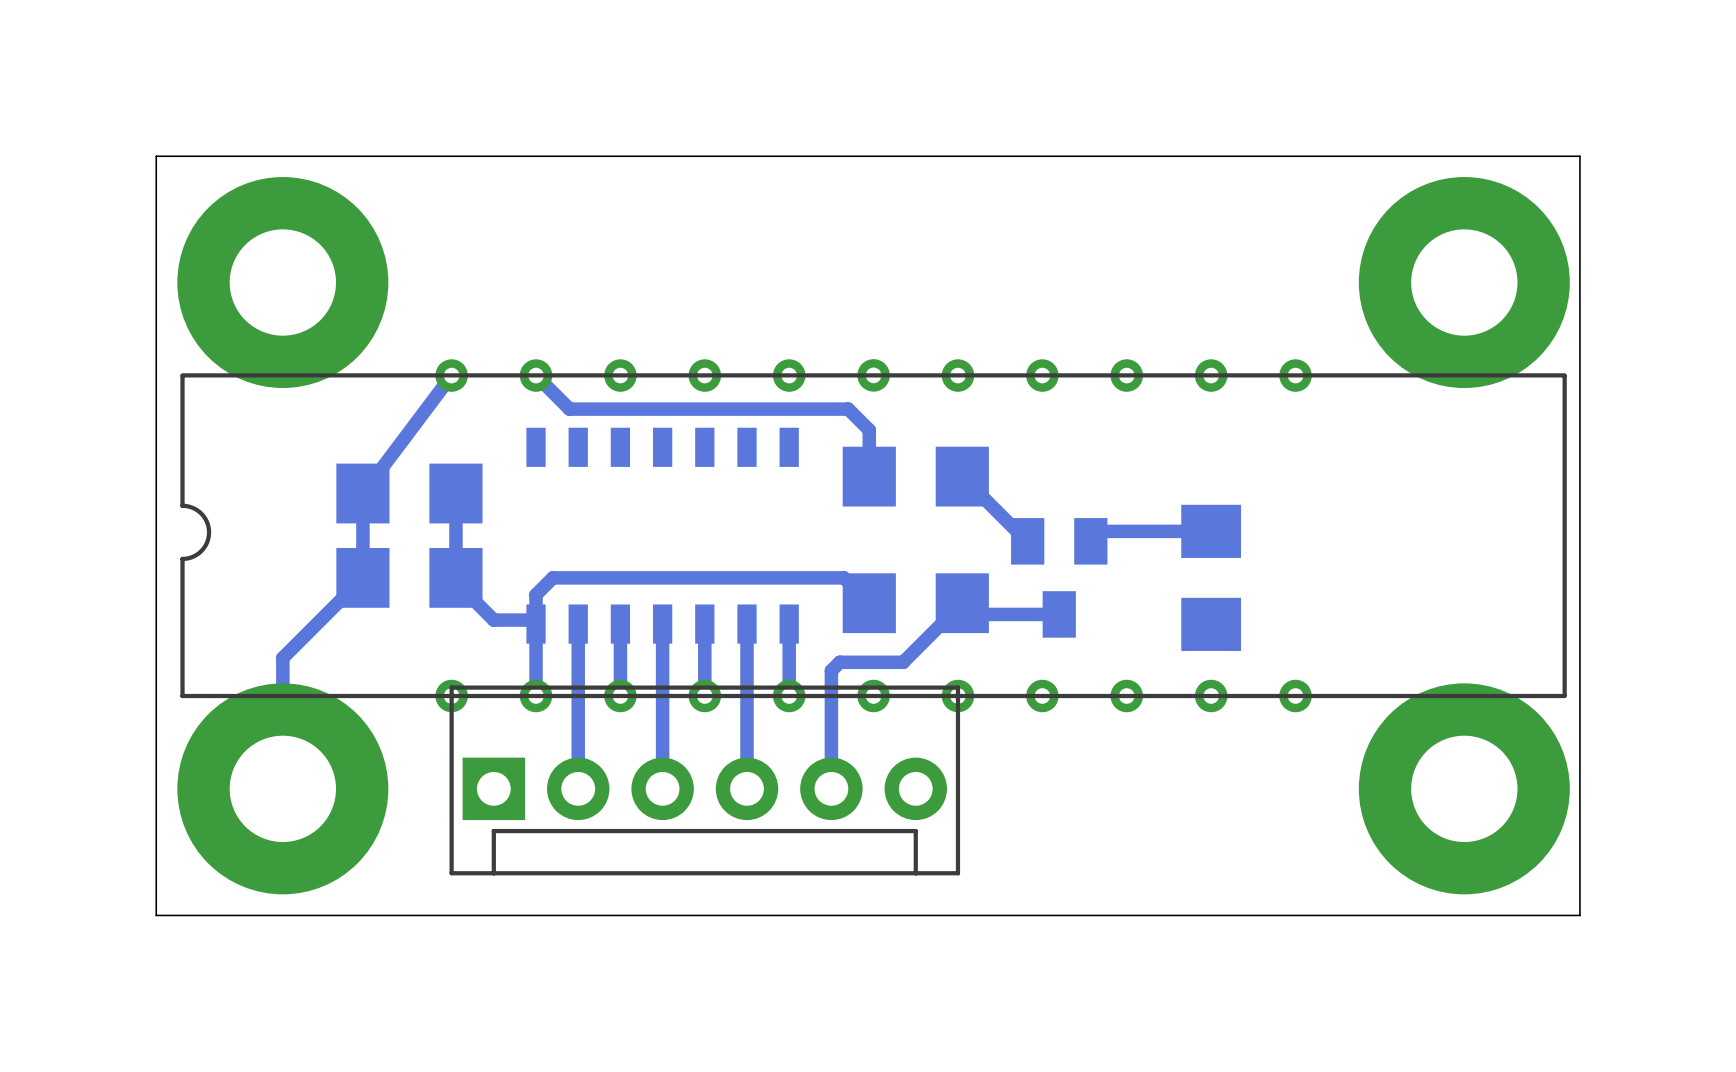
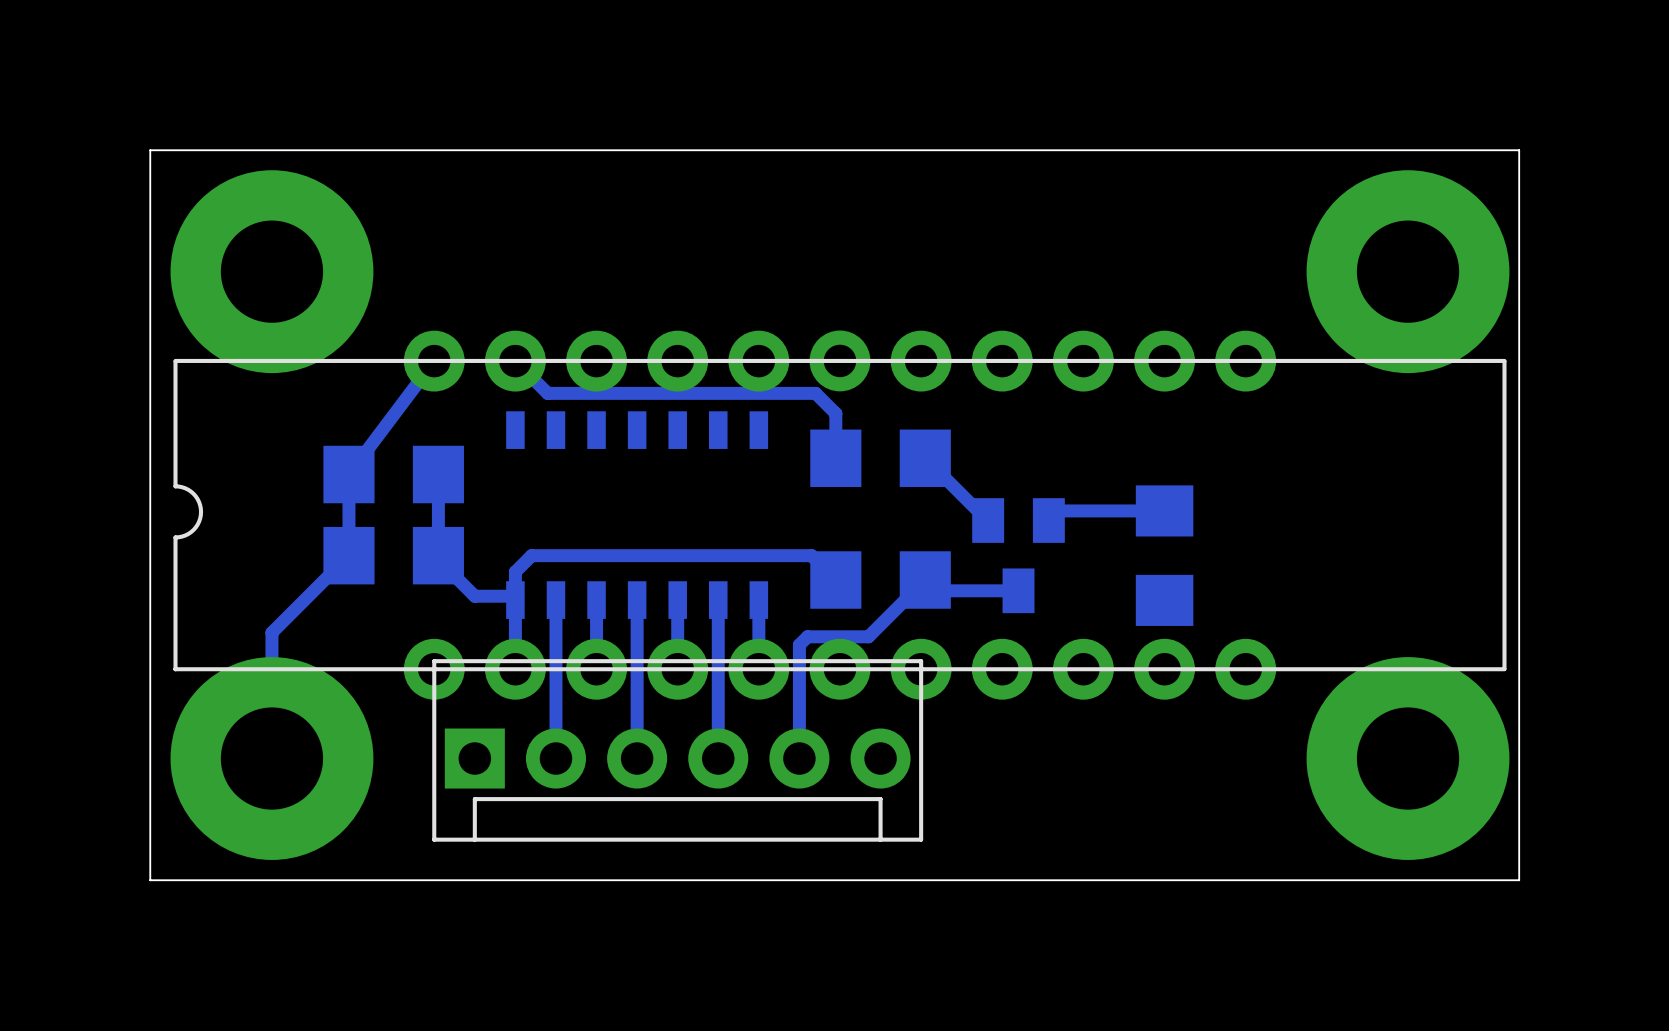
part footprint: [180, 359, 1567, 713] -> [173, 330, 1507, 700]

